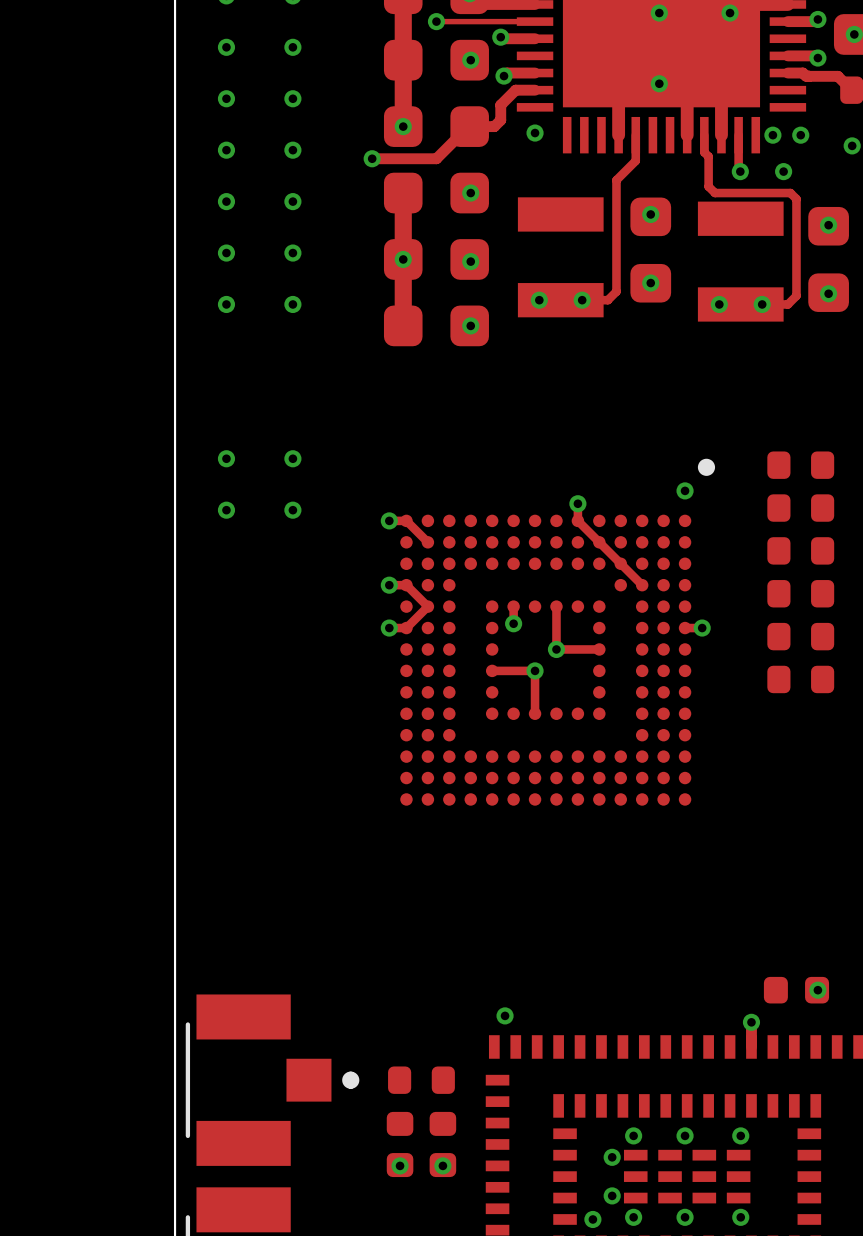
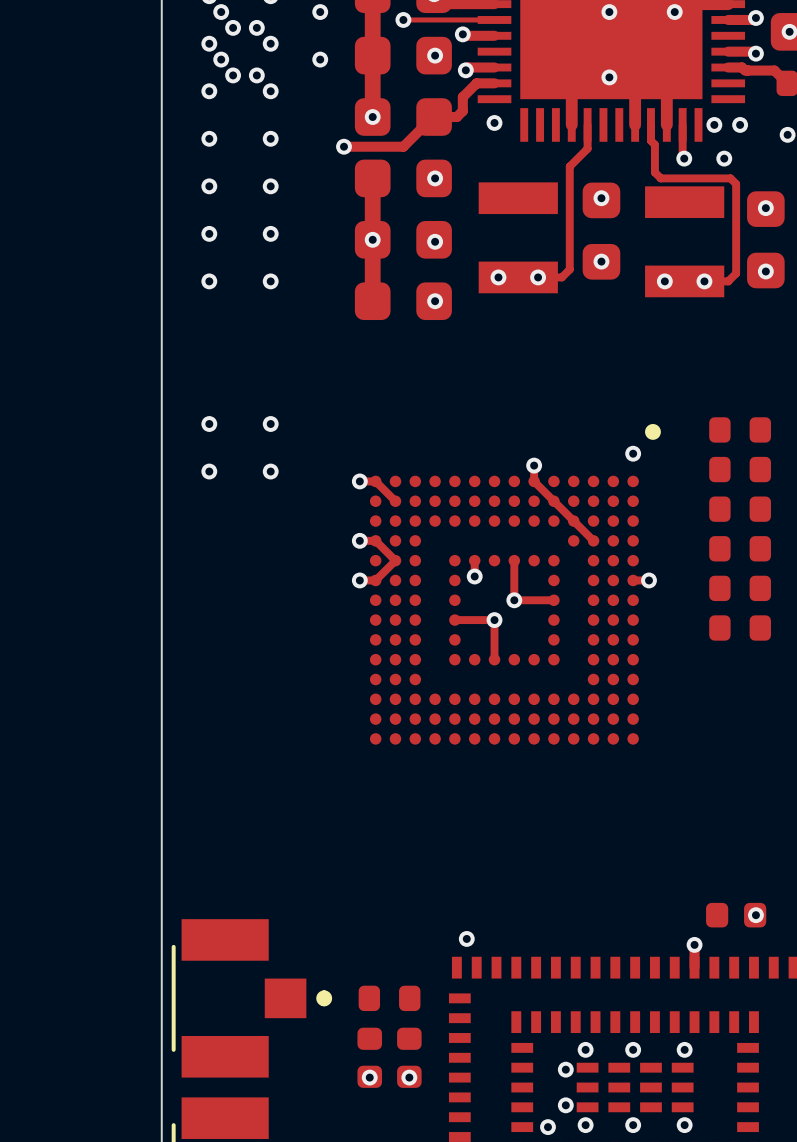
via: none -> (221, 12)
via: none -> (320, 12)
via: none -> (233, 27)
via: none -> (256, 27)
via: none -> (221, 59)
via: none -> (320, 59)
via: none -> (233, 75)
via: none -> (256, 75)

